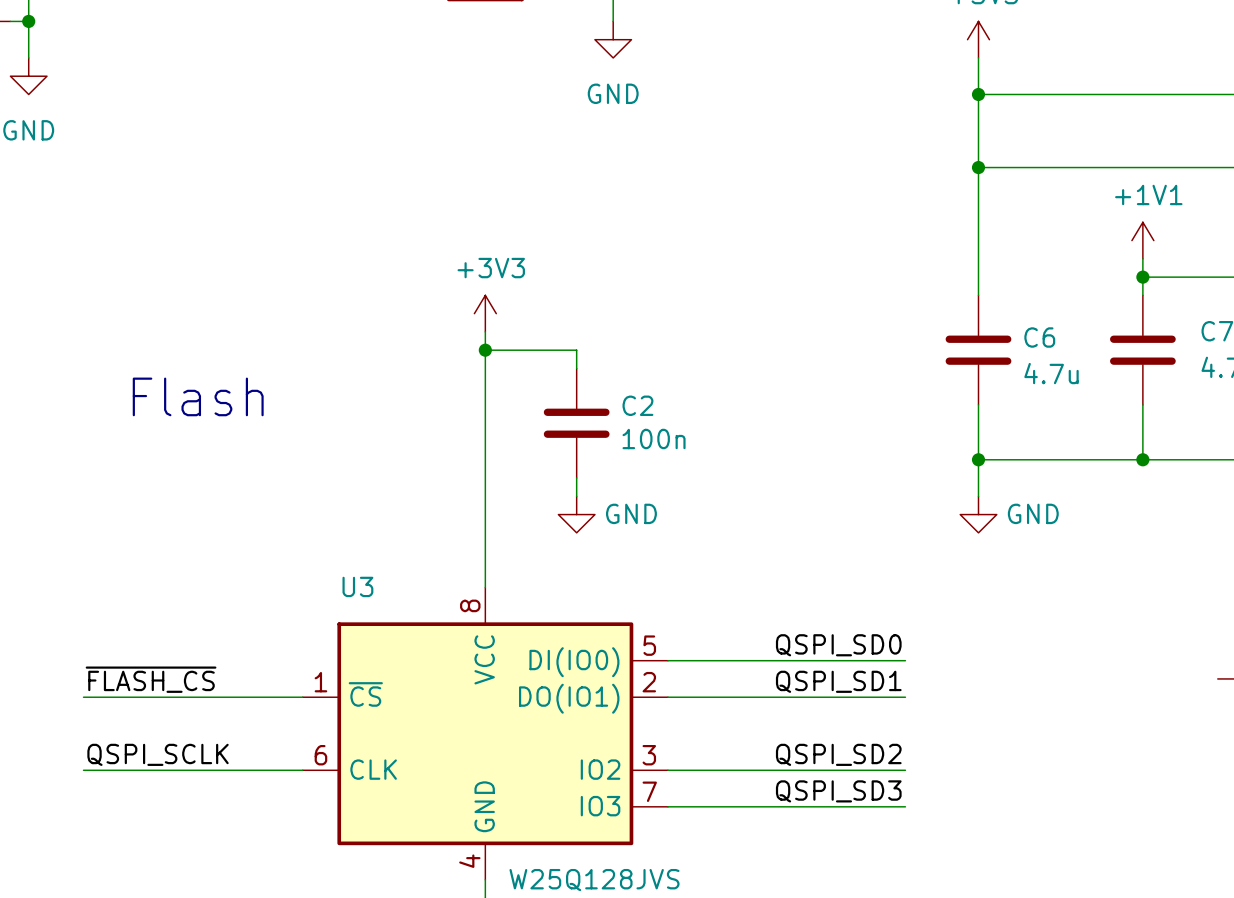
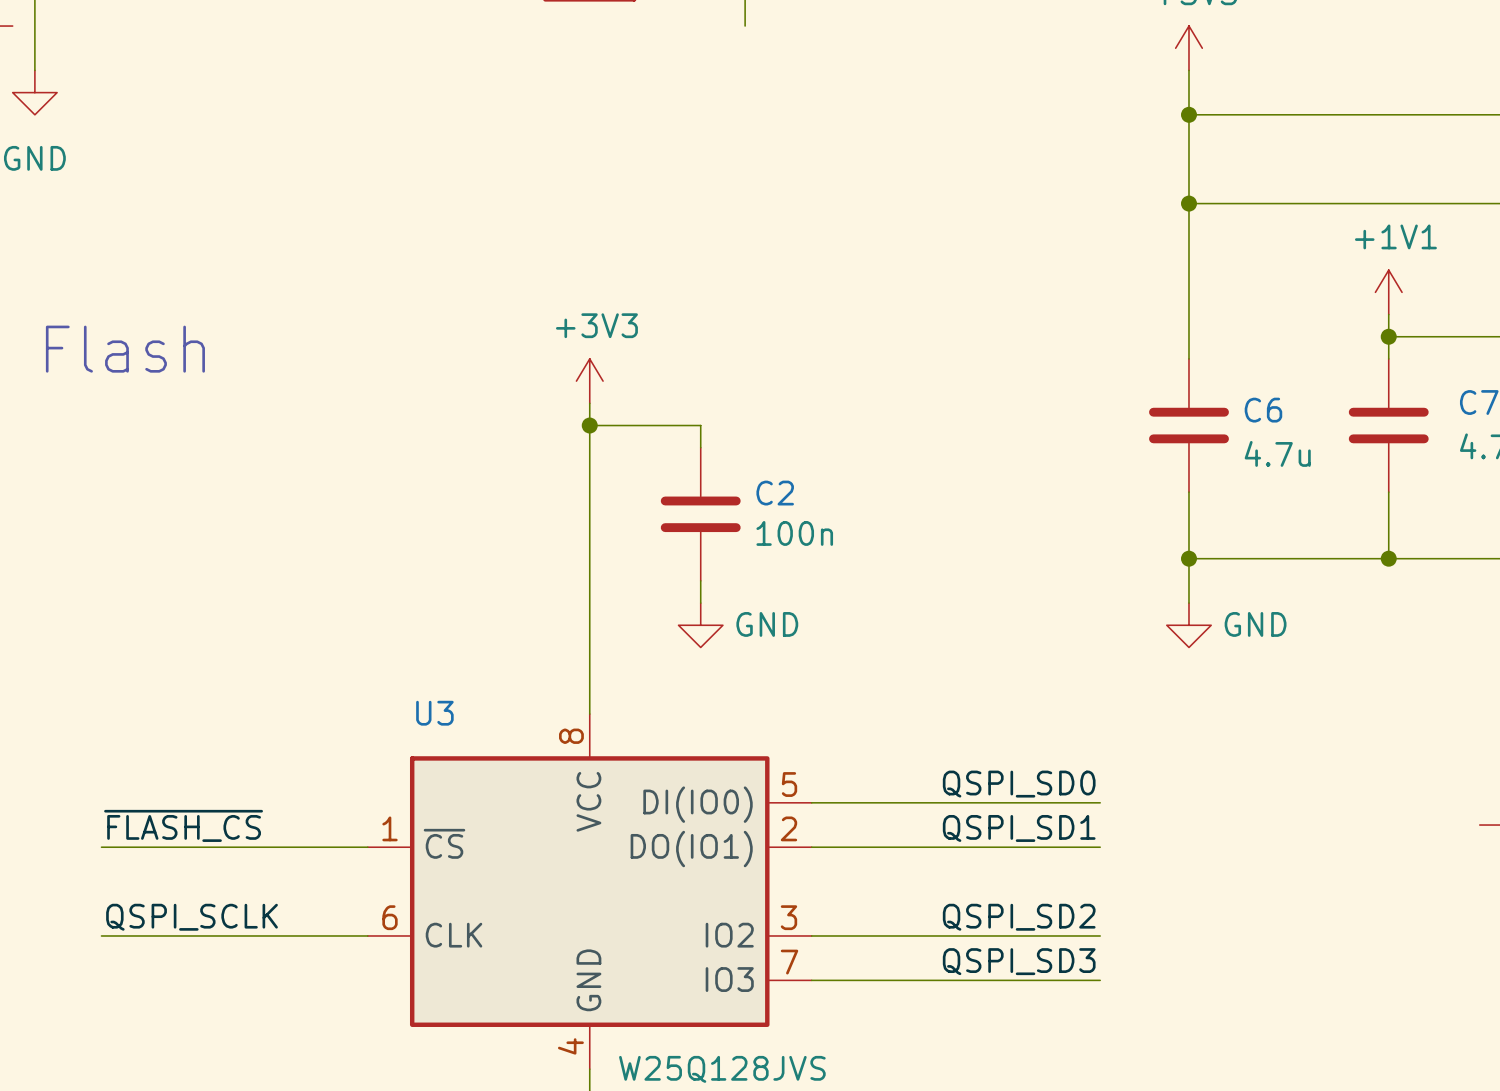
wire: (10, 21) (28, 21) -> none
junction: (28, 21) -> none
power symbol: GND (613, 39) -> none
text position: Flash (198, 396) -> Flash (125, 349)

